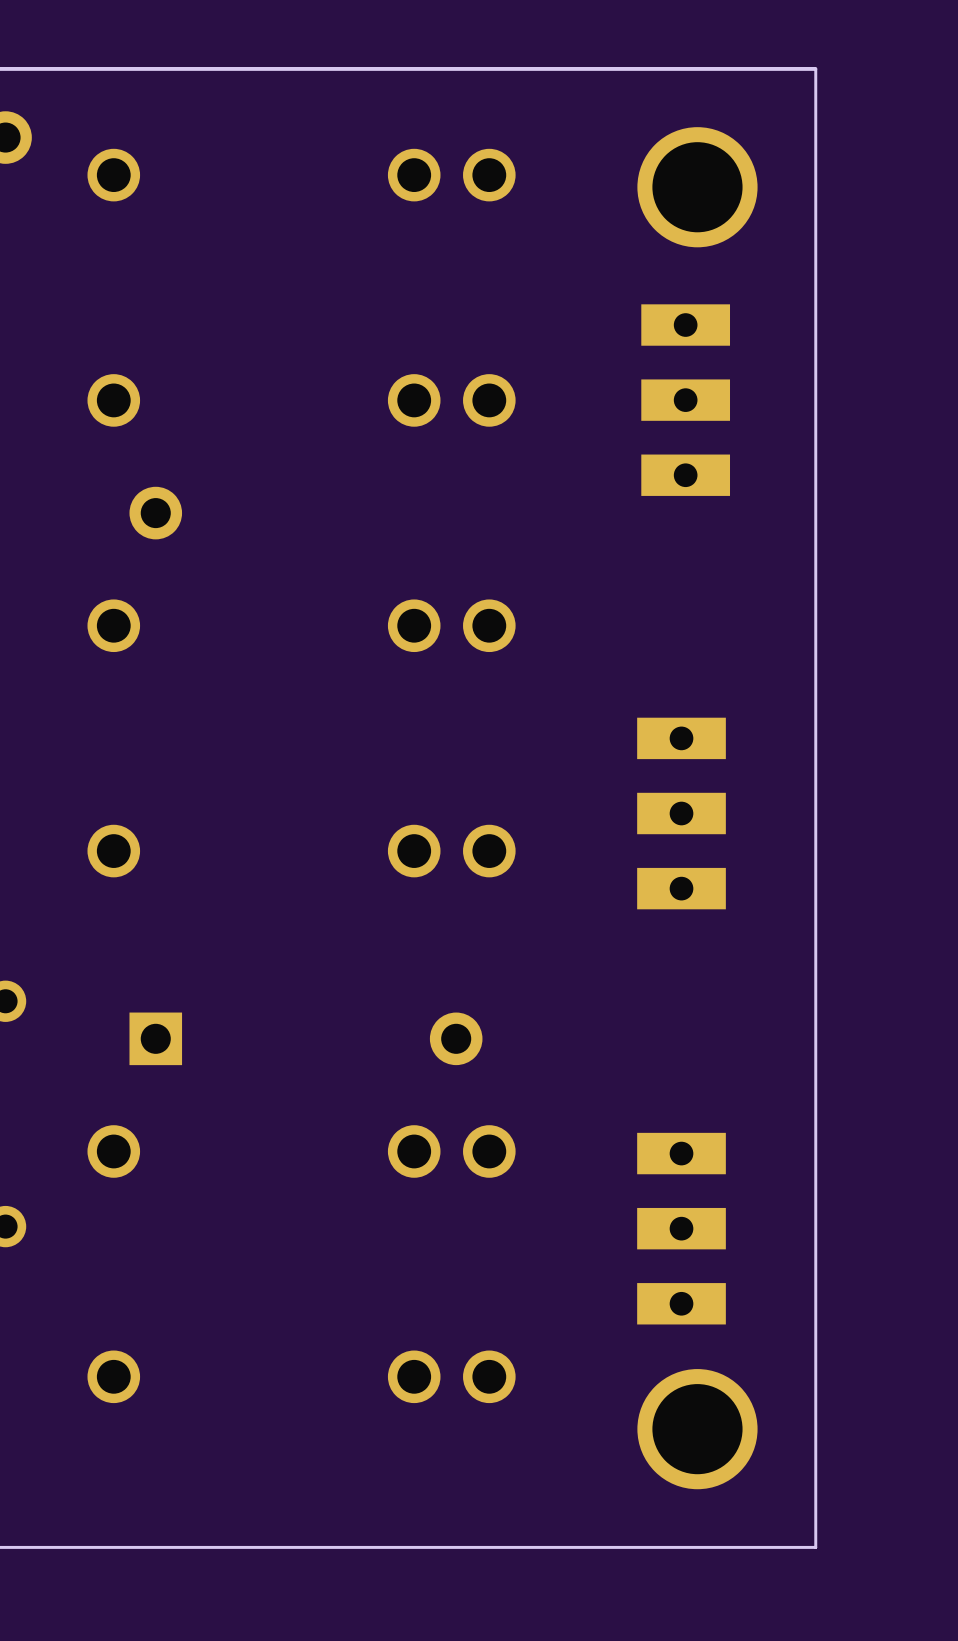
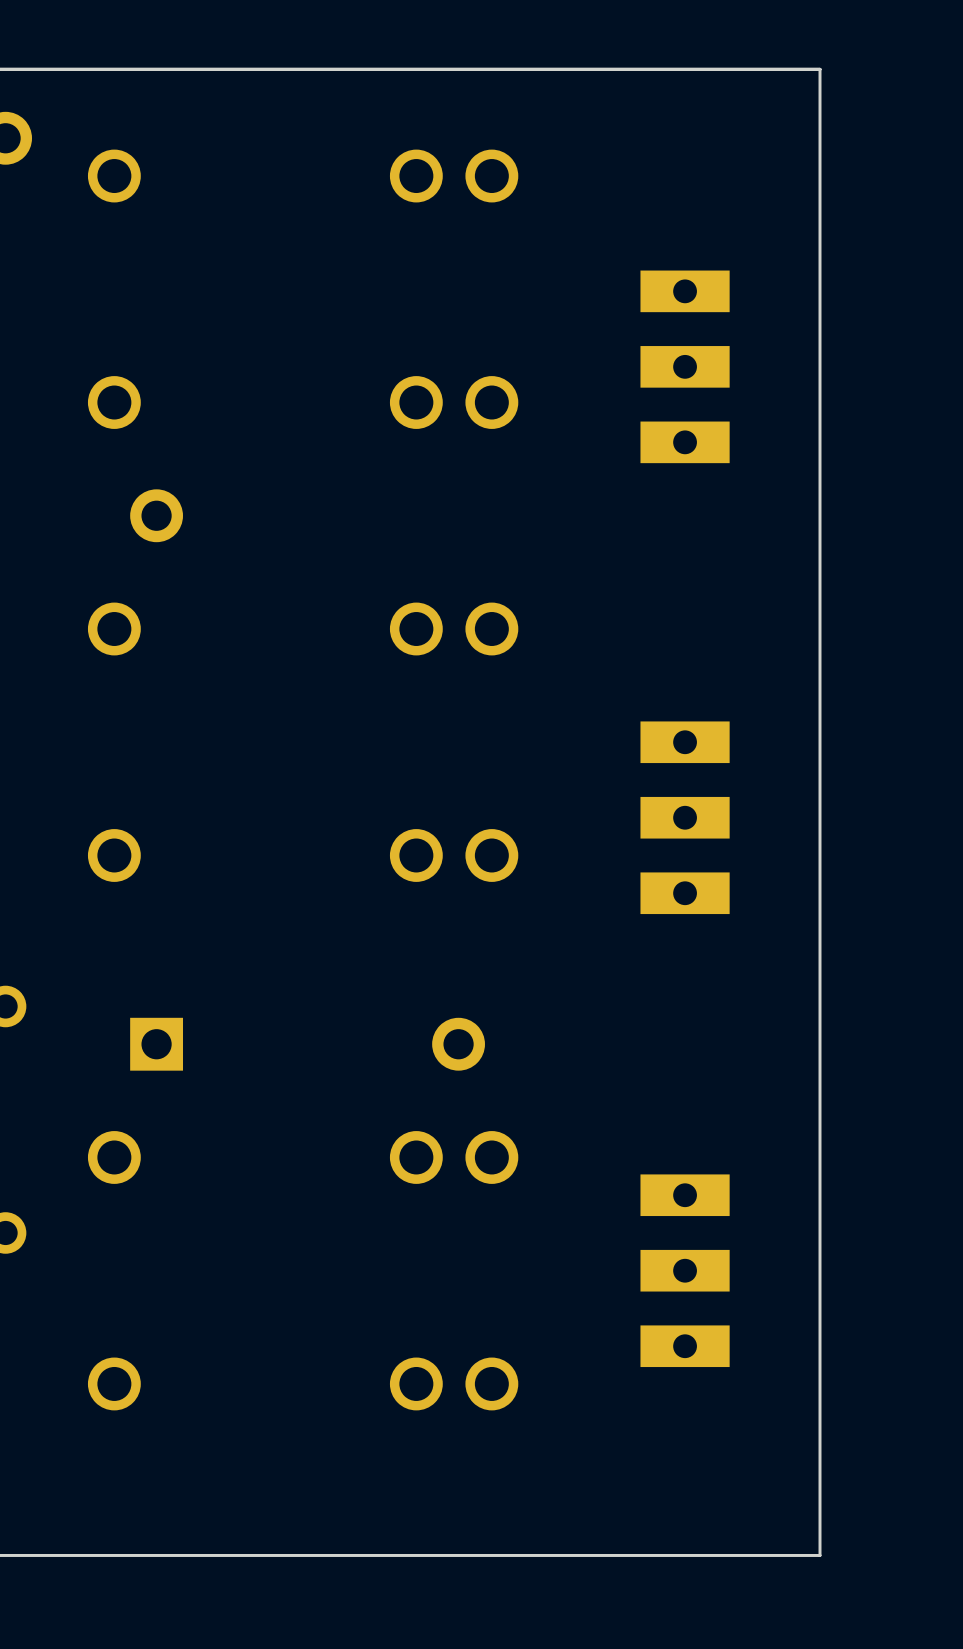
part: (697, 187) -> none
part position: (685, 400) -> (685, 366)
part position: (681, 1228) -> (685, 1270)
part: (697, 1429) -> none

